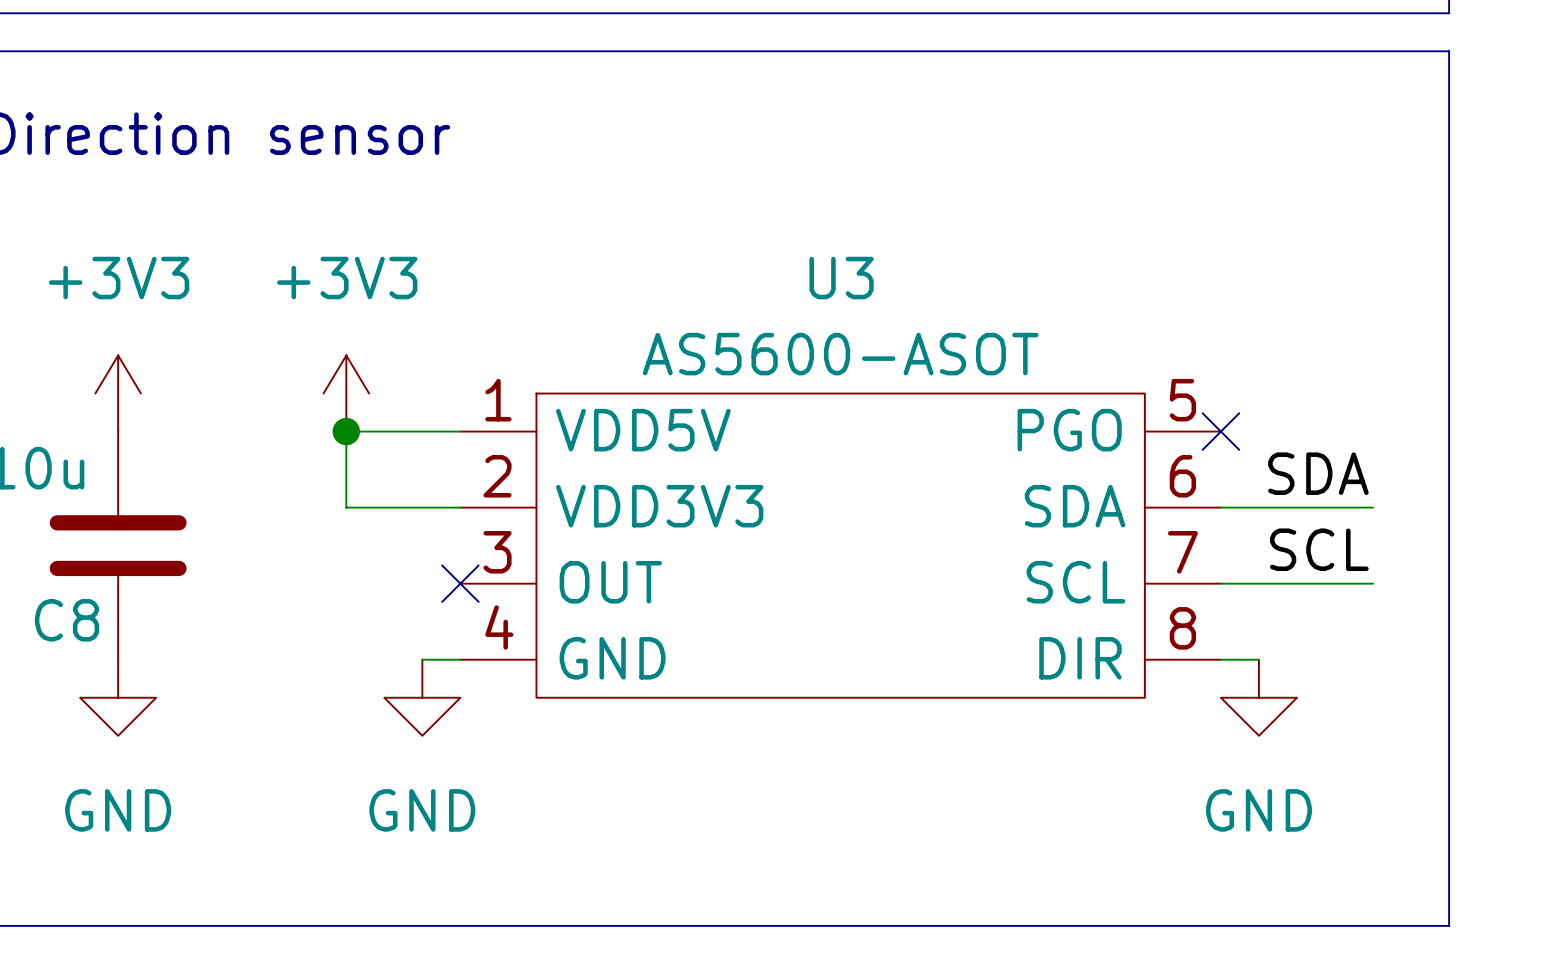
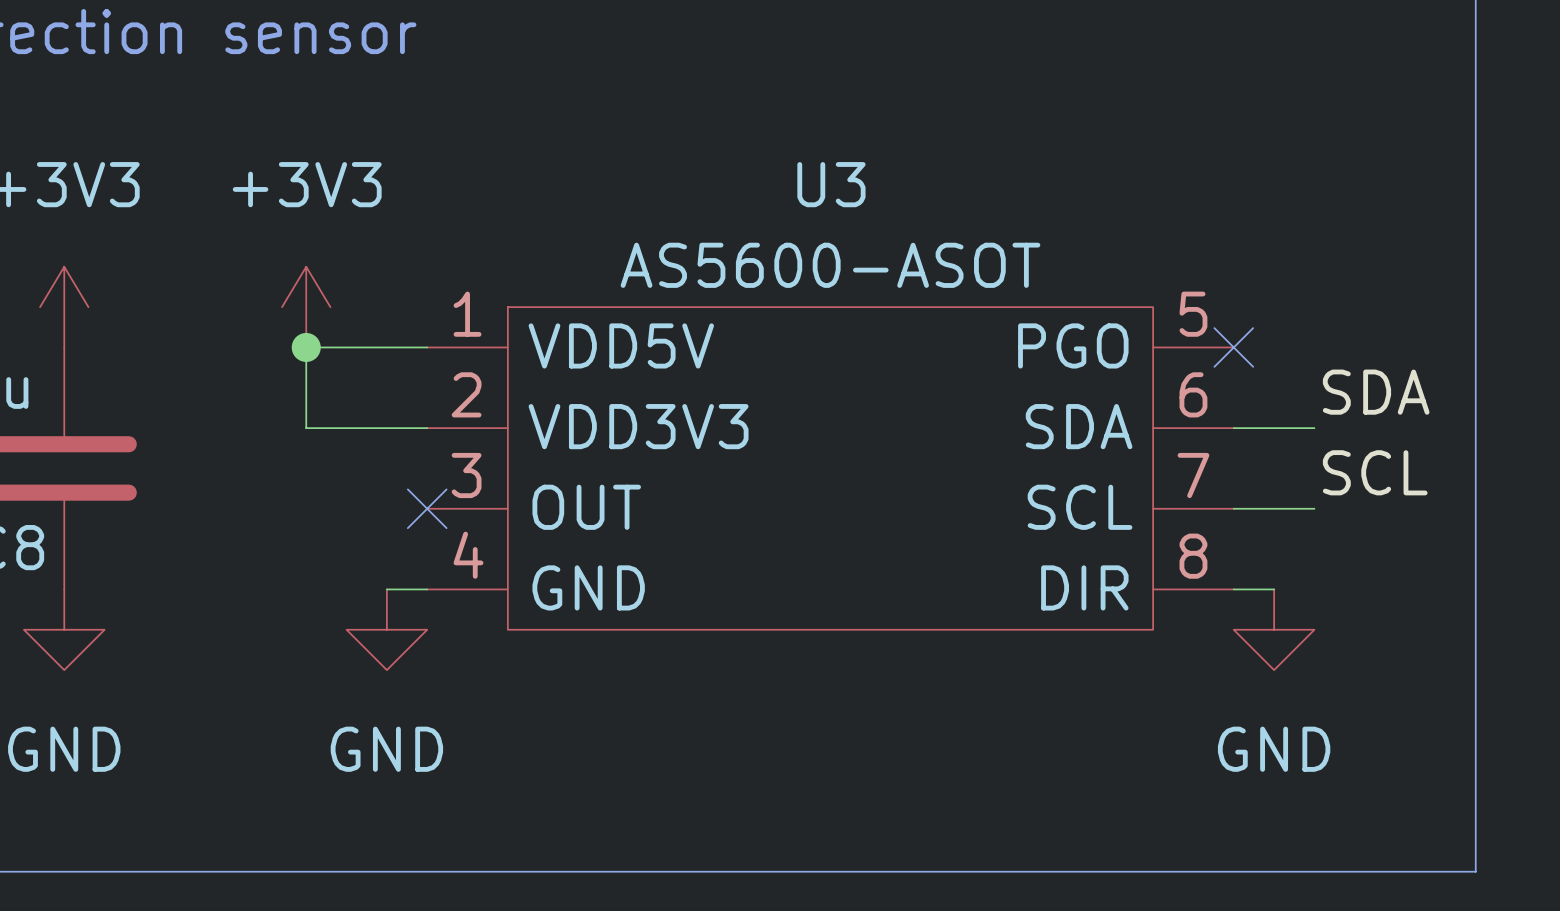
label position: SDA (1318, 473) -> SDA (1376, 392)
wire: (1296, 507) (1373, 507) -> none
label position: SCL (1319, 549) -> SCL (1375, 472)
wire: (1296, 583) (1373, 583) -> none

